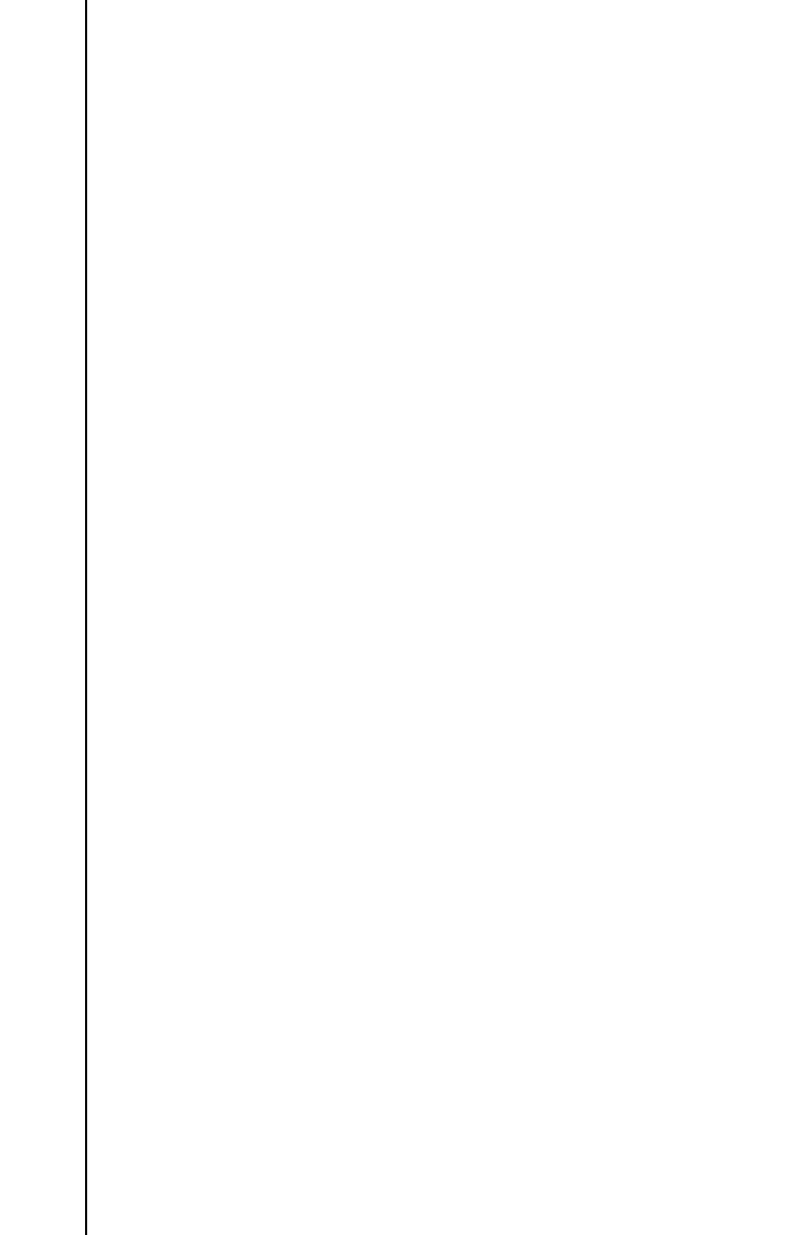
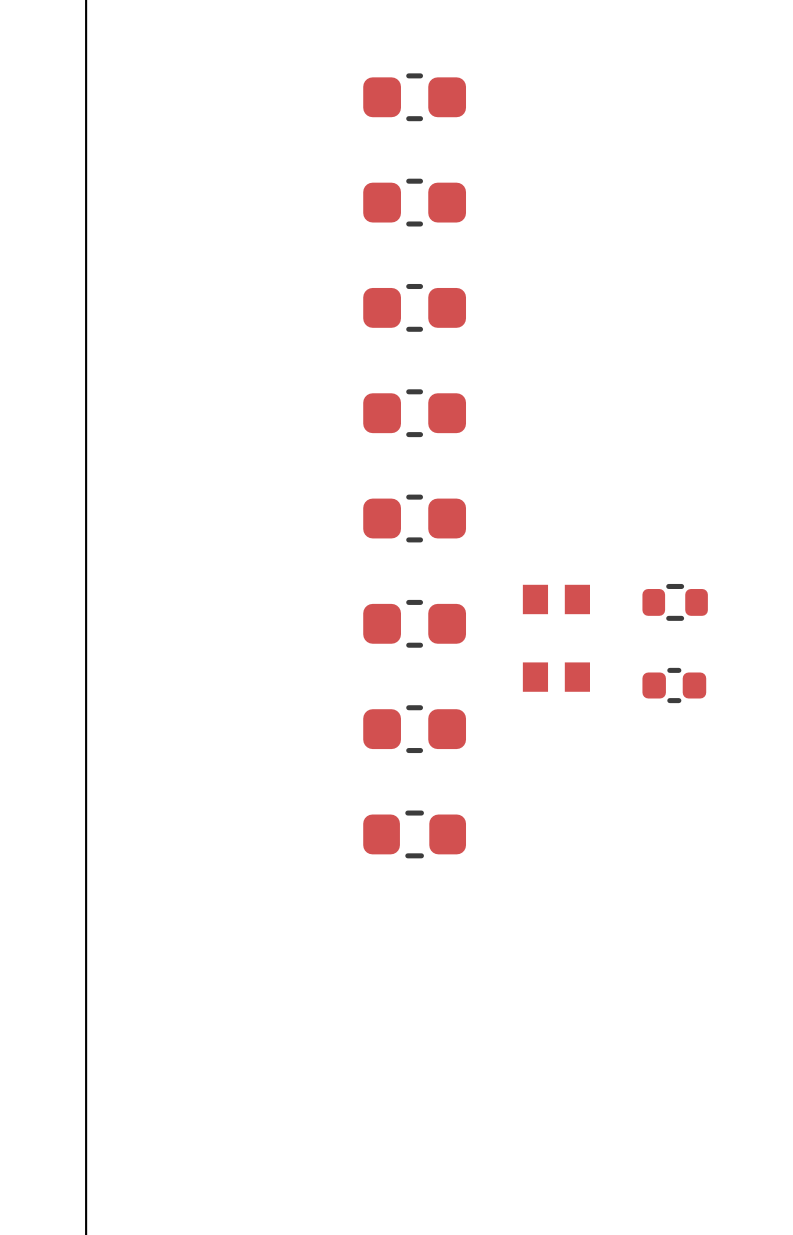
part: none -> (414, 97)
part: none -> (414, 202)
part: none -> (414, 307)
part: none -> (414, 413)
part: none -> (414, 518)
part: none -> (556, 599)
part: none -> (675, 602)
part: none -> (414, 623)
part: none -> (556, 677)
part: none -> (674, 685)
part: none -> (414, 729)
part: none -> (414, 834)

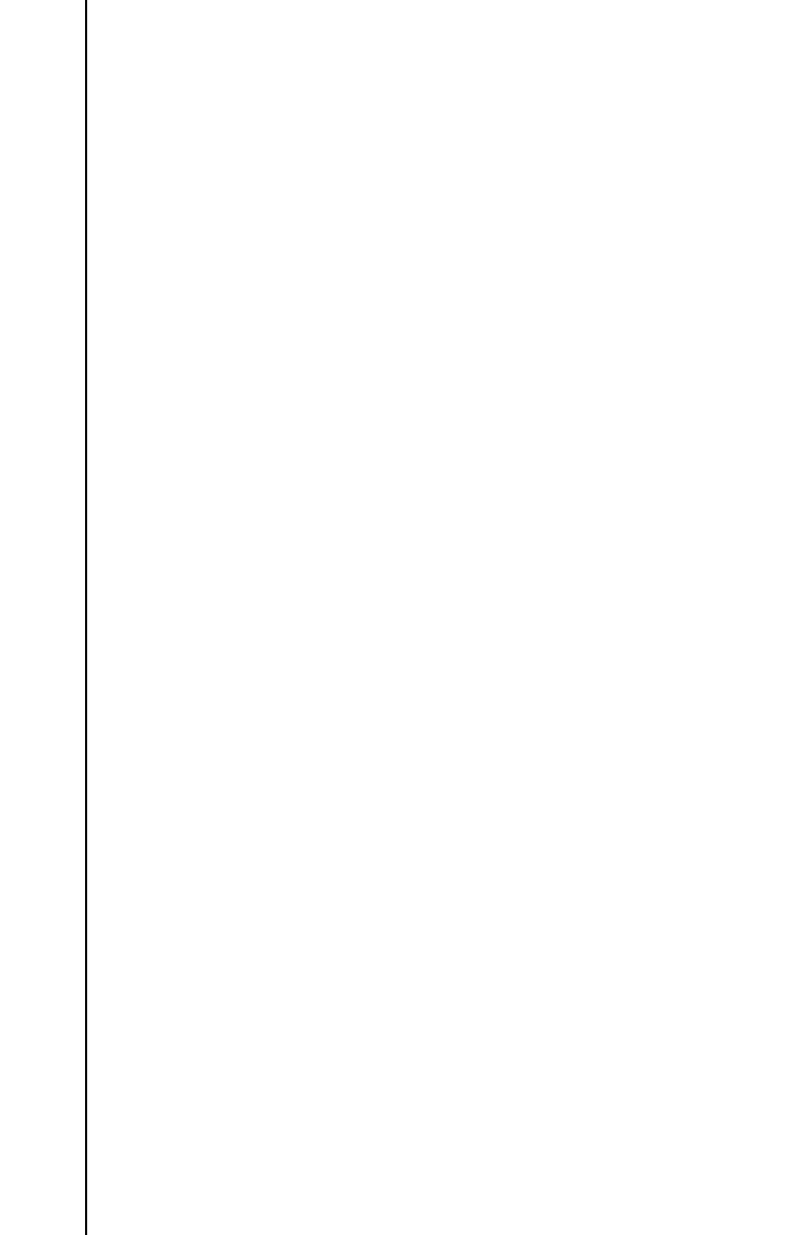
part: (414, 97) -> none
part: (414, 202) -> none
part: (414, 307) -> none
part: (414, 413) -> none
part: (414, 518) -> none
part: (556, 599) -> none
part: (675, 602) -> none
part: (414, 623) -> none
part: (556, 677) -> none
part: (674, 685) -> none
part: (414, 729) -> none
part: (414, 834) -> none

